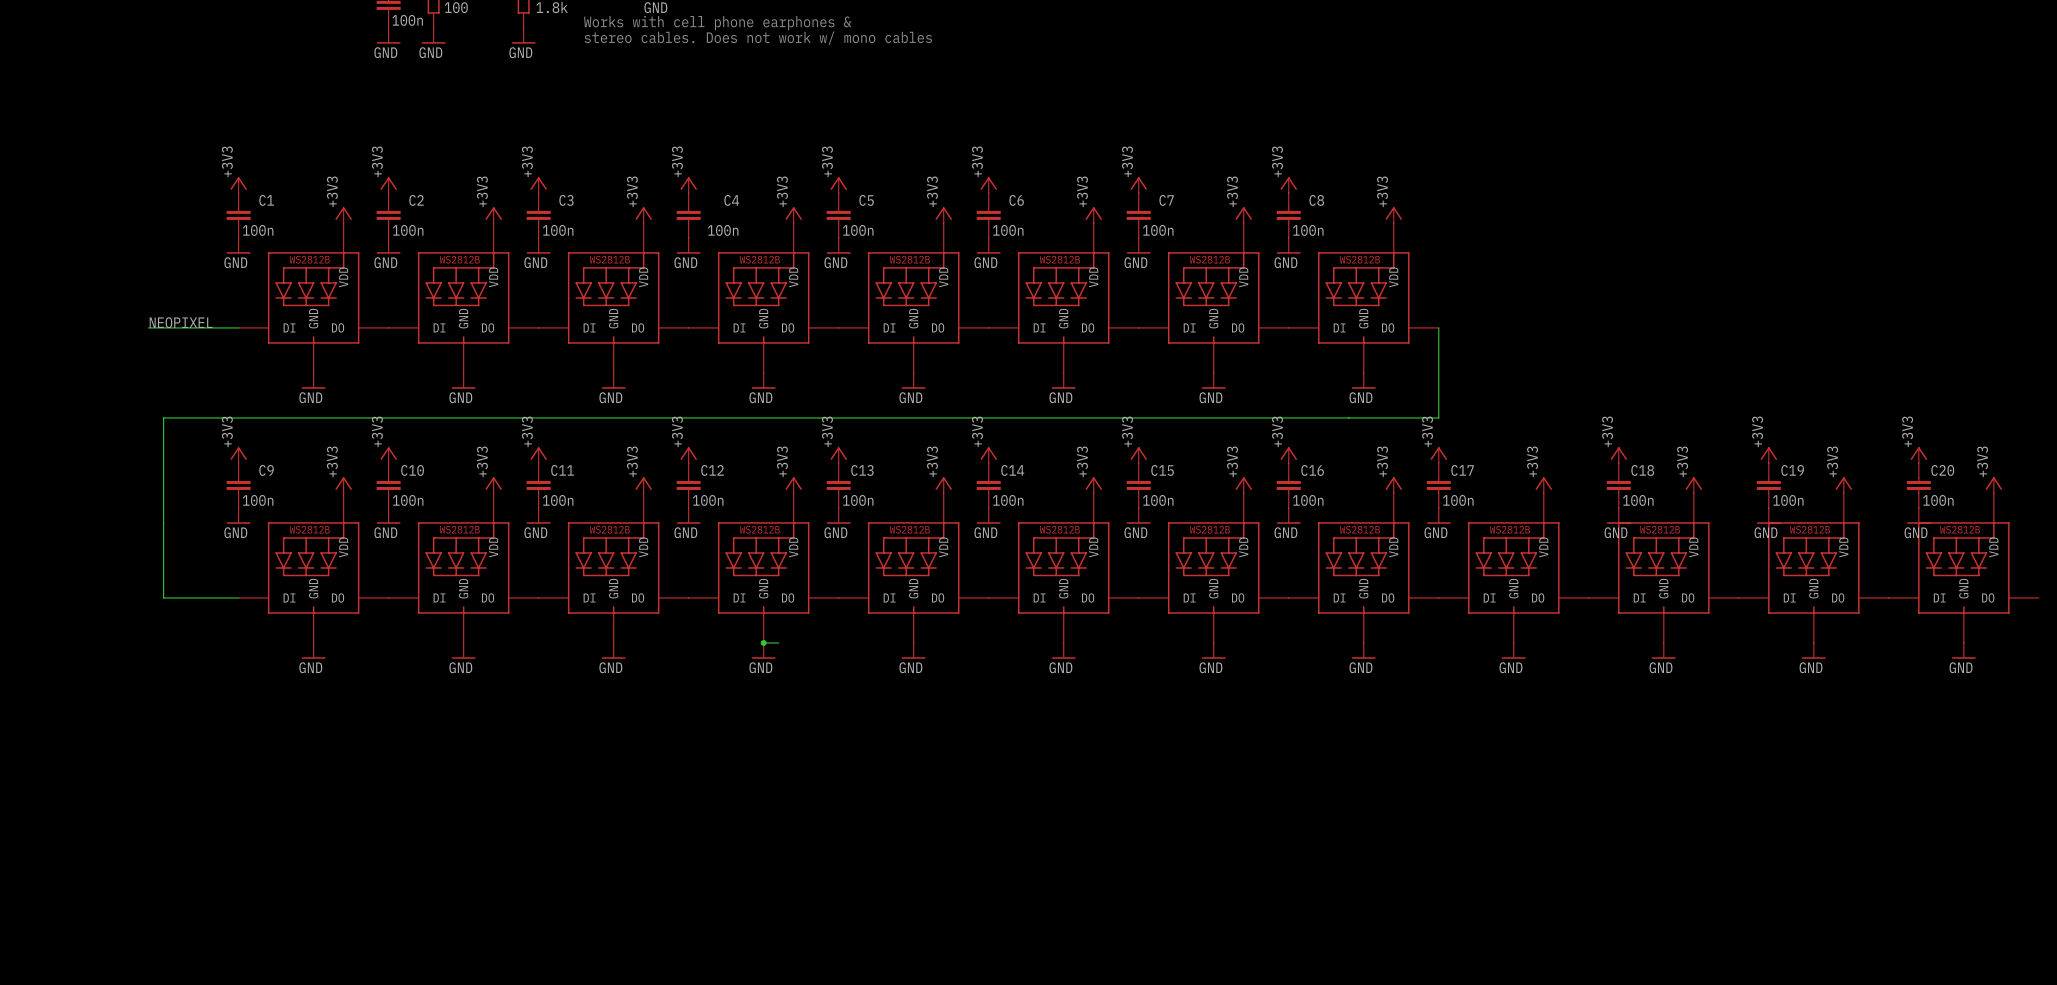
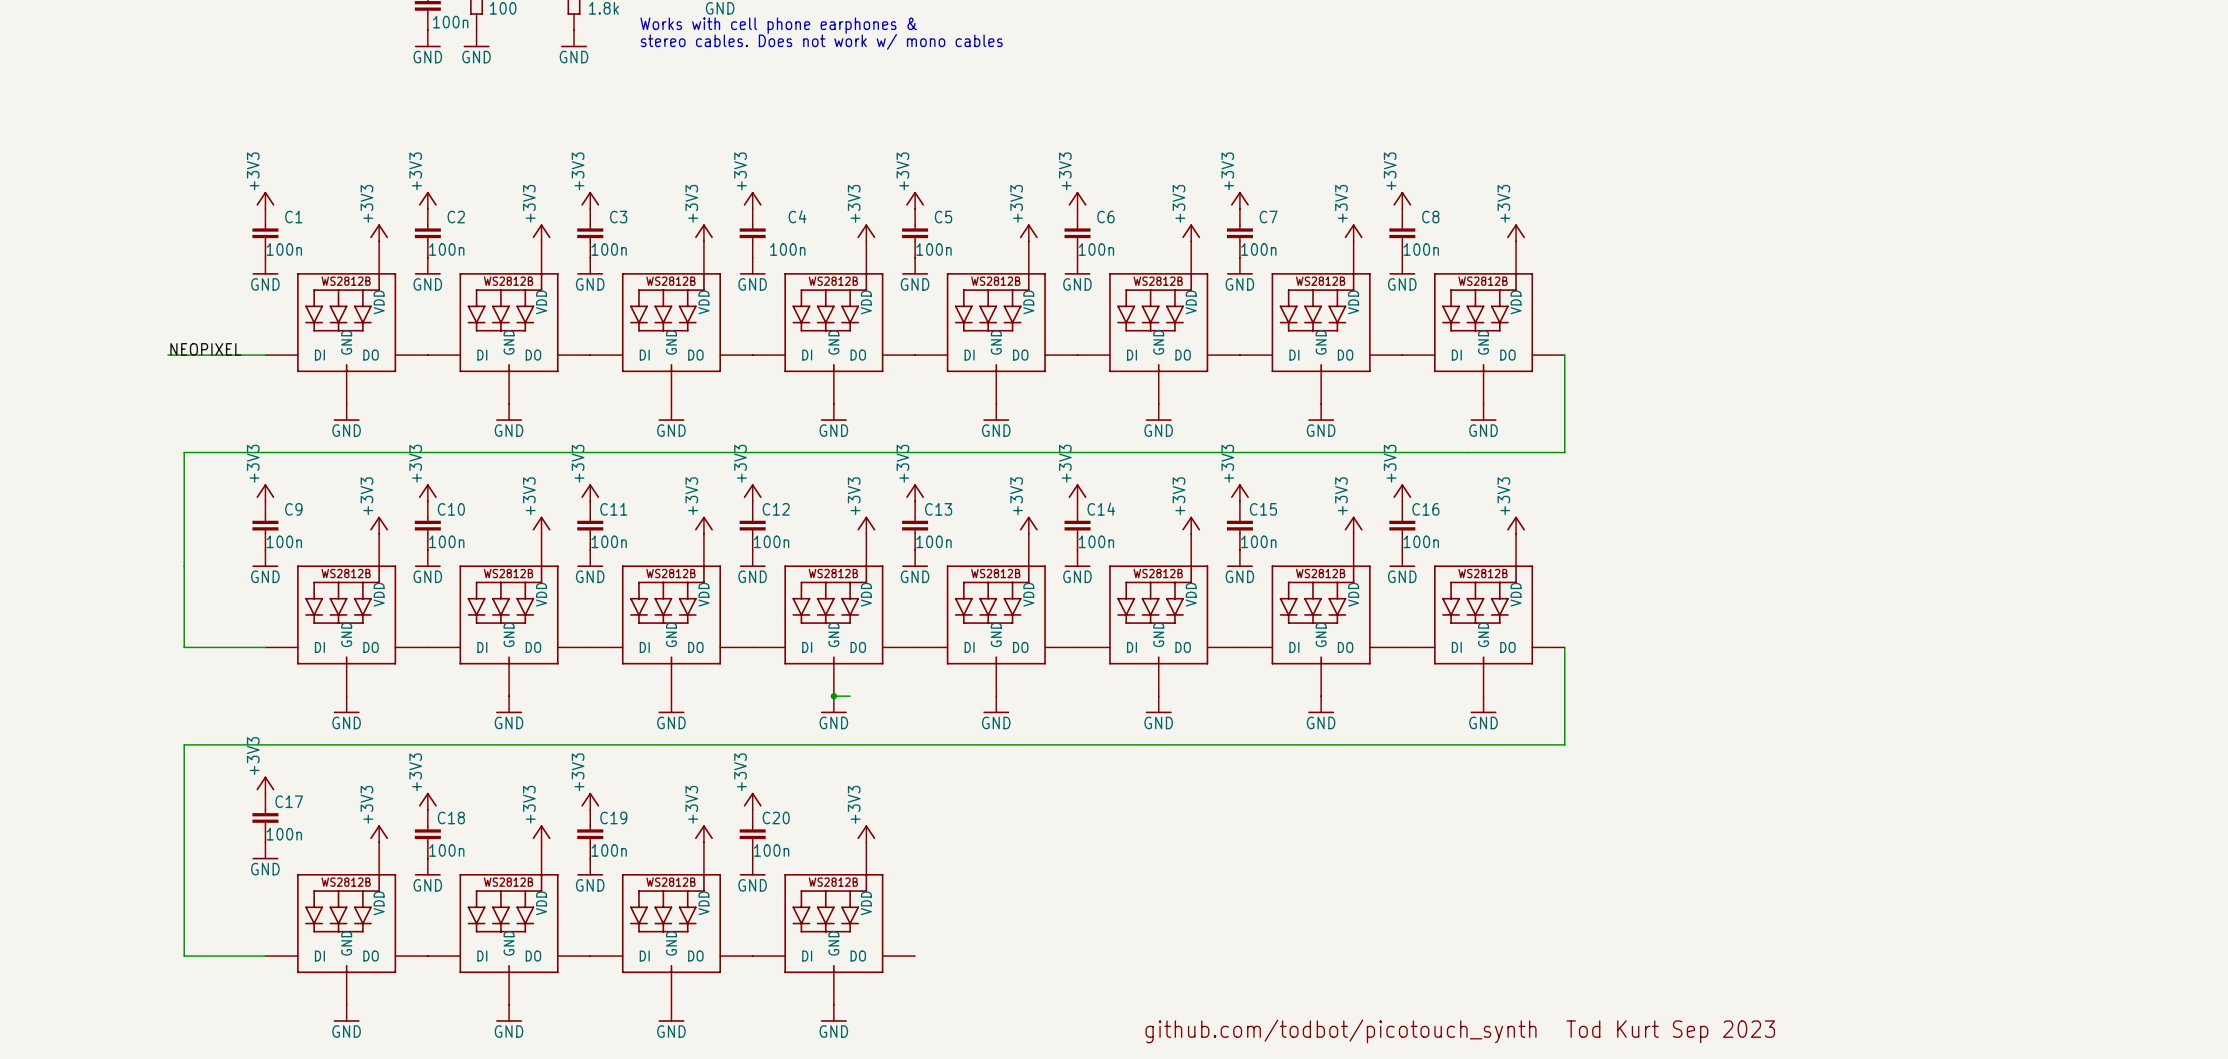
power symbol: +3V3 (1438, 455) -> none
power symbol: +3V3 (1618, 455) -> none
power symbol: +3V3 (1768, 455) -> none
power symbol: +3V3 (1918, 455) -> none
C17 position: (1438, 485) -> (265, 817)
power symbol: +3V3 (1543, 485) -> none
C18 position: (1618, 485) -> (427, 834)
power symbol: +3V3 (1693, 485) -> none
C19 position: (1768, 485) -> (590, 834)
power symbol: +3V3 (1843, 485) -> none
C20 position: (1918, 485) -> (752, 834)
power symbol: +3V3 (1993, 485) -> none
power symbol: GND (1438, 515) -> none
power symbol: GND (1618, 515) -> none
power symbol: GND (1768, 515) -> none
power symbol: GND (1918, 515) -> none
part: (1513, 567) -> none
part: (1663, 567) -> none
part: (1813, 567) -> none
part: (1963, 567) -> none
wire: none -> (1564, 647) (1564, 744) (184, 744) (184, 956) (265, 956)
power symbol: GND (1513, 650) -> none
power symbol: GND (1663, 650) -> none
power symbol: GND (1813, 650) -> none
power symbol: GND (1963, 650) -> none
power symbol: none -> +3V3 (265, 785)
power symbol: none -> +3V3 (427, 801)
power symbol: none -> +3V3 (590, 801)
power symbol: none -> +3V3 (752, 801)
power symbol: none -> +3V3 (379, 833)
power symbol: none -> +3V3 (541, 833)
power symbol: none -> +3V3 (703, 833)
power symbol: none -> +3V3 (866, 833)
power symbol: none -> GND (265, 850)
power symbol: none -> GND (427, 867)
power symbol: none -> GND (590, 867)
power symbol: none -> GND (752, 867)
part: none -> (346, 923)
part: none -> (509, 923)
part: none -> (671, 923)
part: none -> (833, 923)
power symbol: none -> GND (346, 1013)
power symbol: none -> GND (509, 1013)
power symbol: none -> GND (671, 1013)
power symbol: none -> GND (833, 1013)
text: none -> github.com/todbot/picotouch_synth (1341, 1031)
text: none -> Tod Kurt Sep 2023 (1670, 1031)

